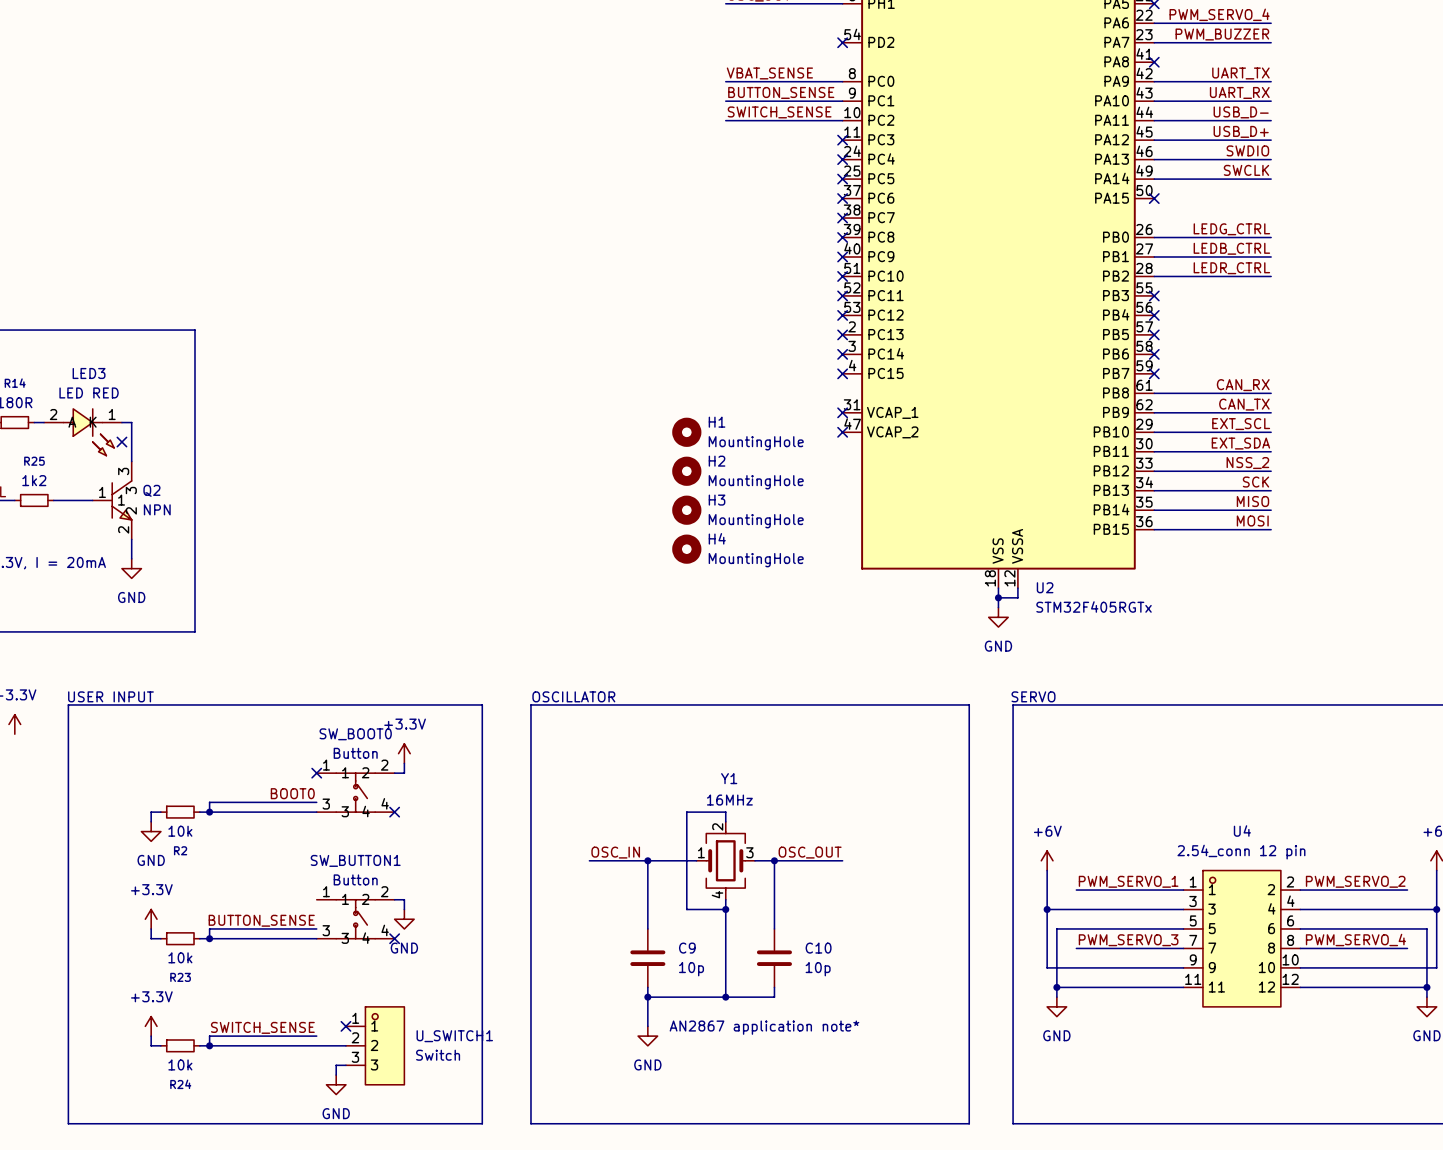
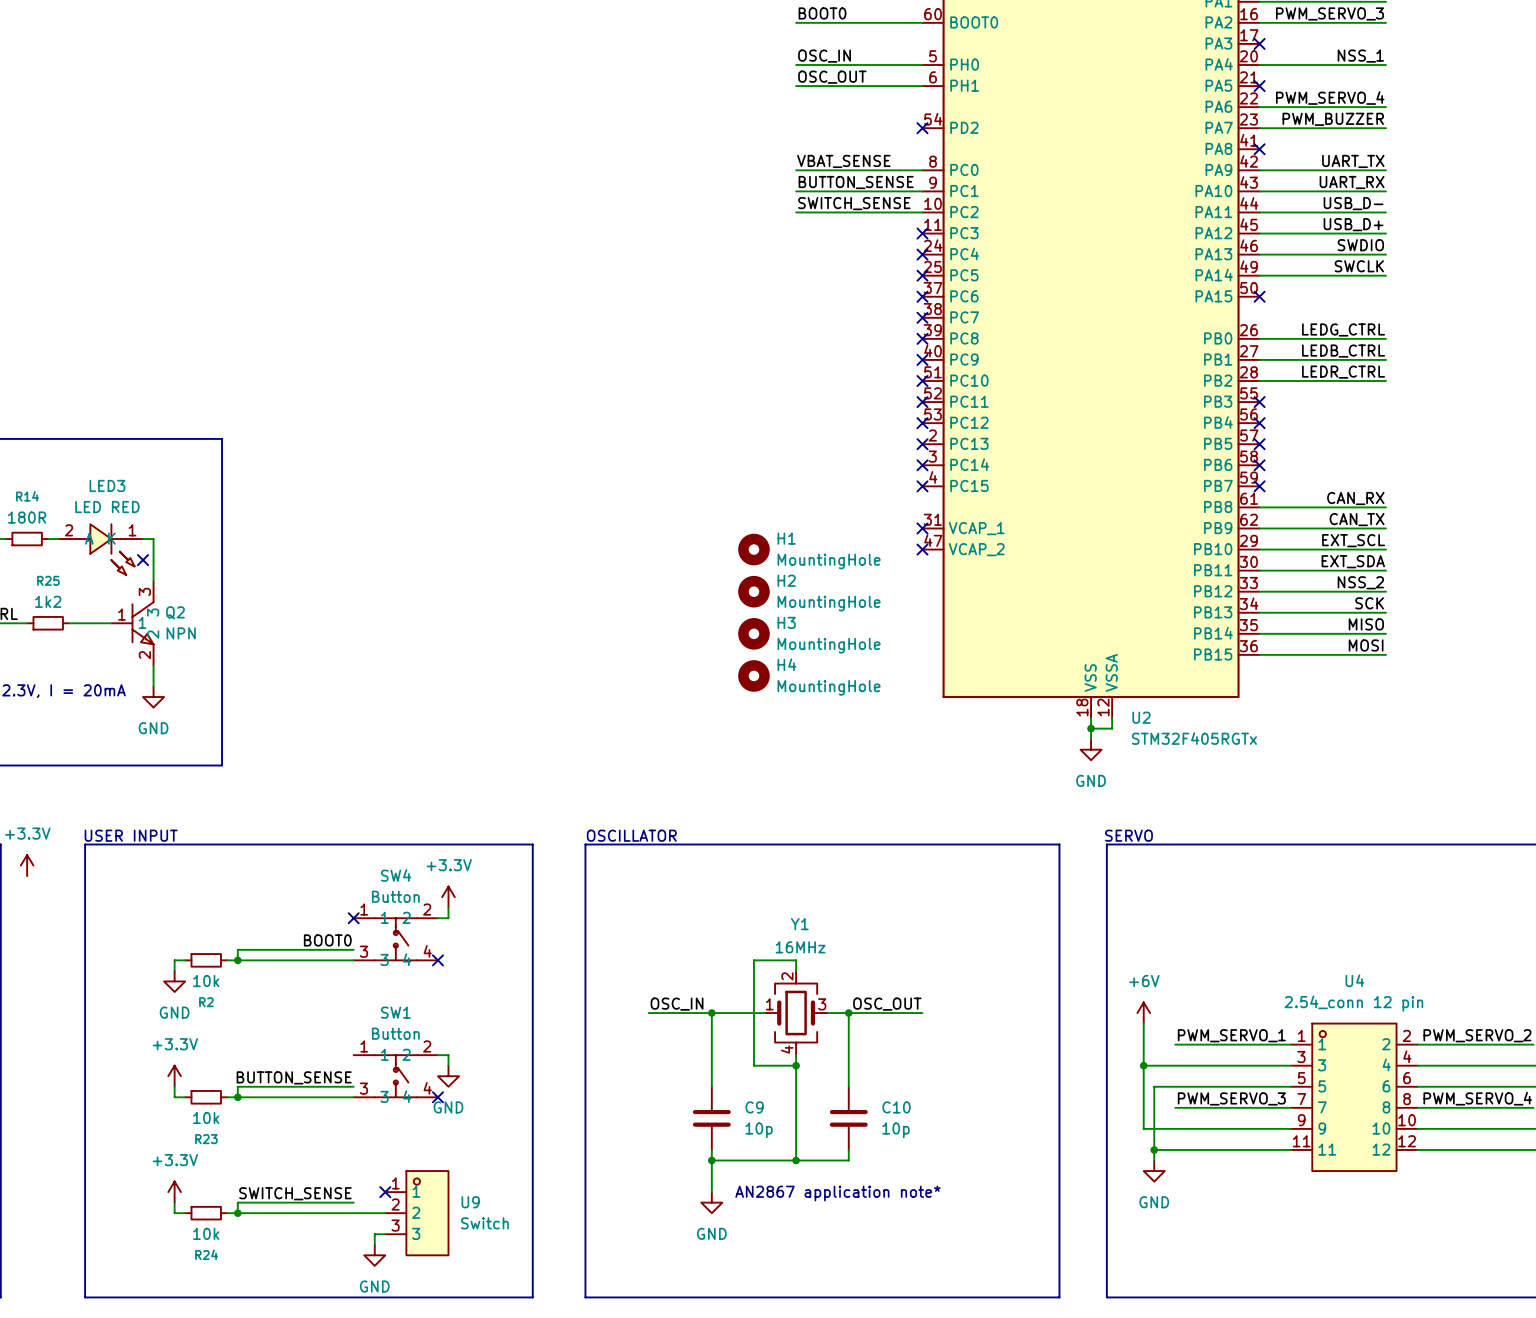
SW_BOOT0 name: SW_BOOT0 (355, 734) -> SW4 (396, 875)
SW_BUTTON1 name: SW_BUTTON1 (355, 860) -> SW1 (395, 1012)
U_SWITCH1 name: U_SWITCH1 (454, 1036) -> U9 (470, 1202)

